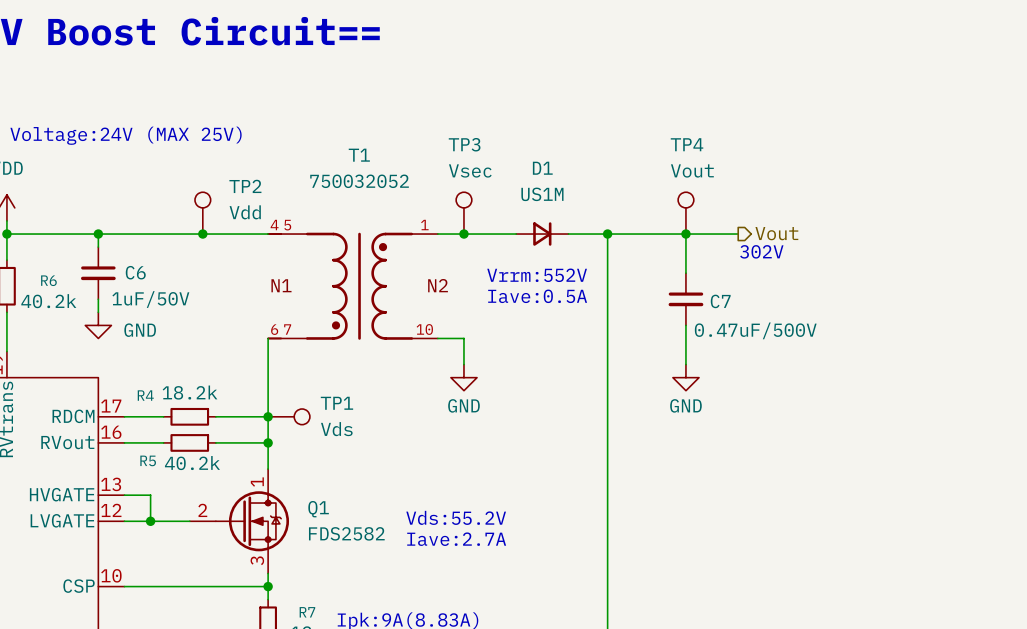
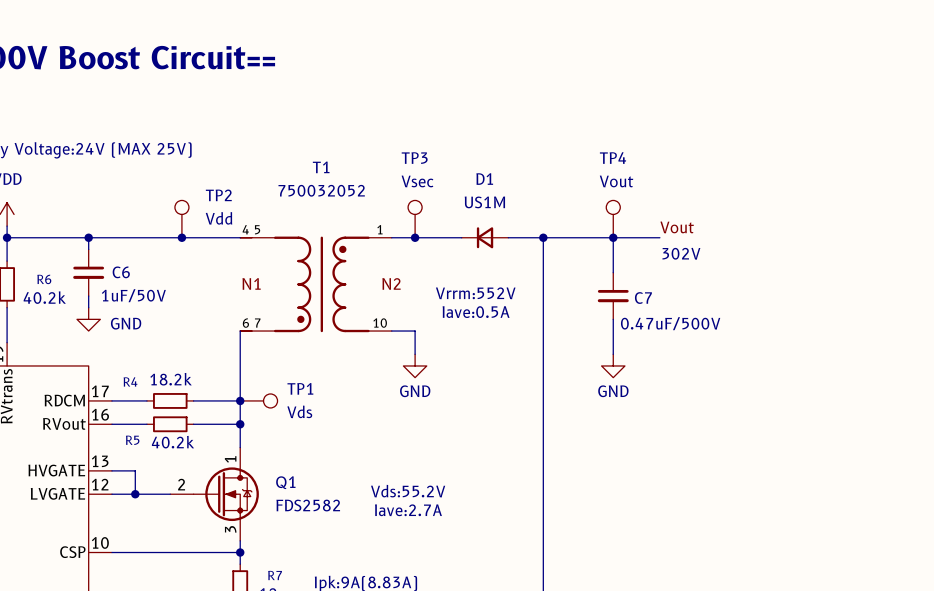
label: none -> Vout (677, 227)
hierarchical label: Vout (776, 233) -> none
D1 rotation: 0° (542, 234) -> 180° (485, 237)
text: Vrrm:552V (537, 275) -> none
text: Iave:0.5A (537, 296) -> Vrrm:552V (475, 293)
text: none -> Iave:0.5A (476, 312)

